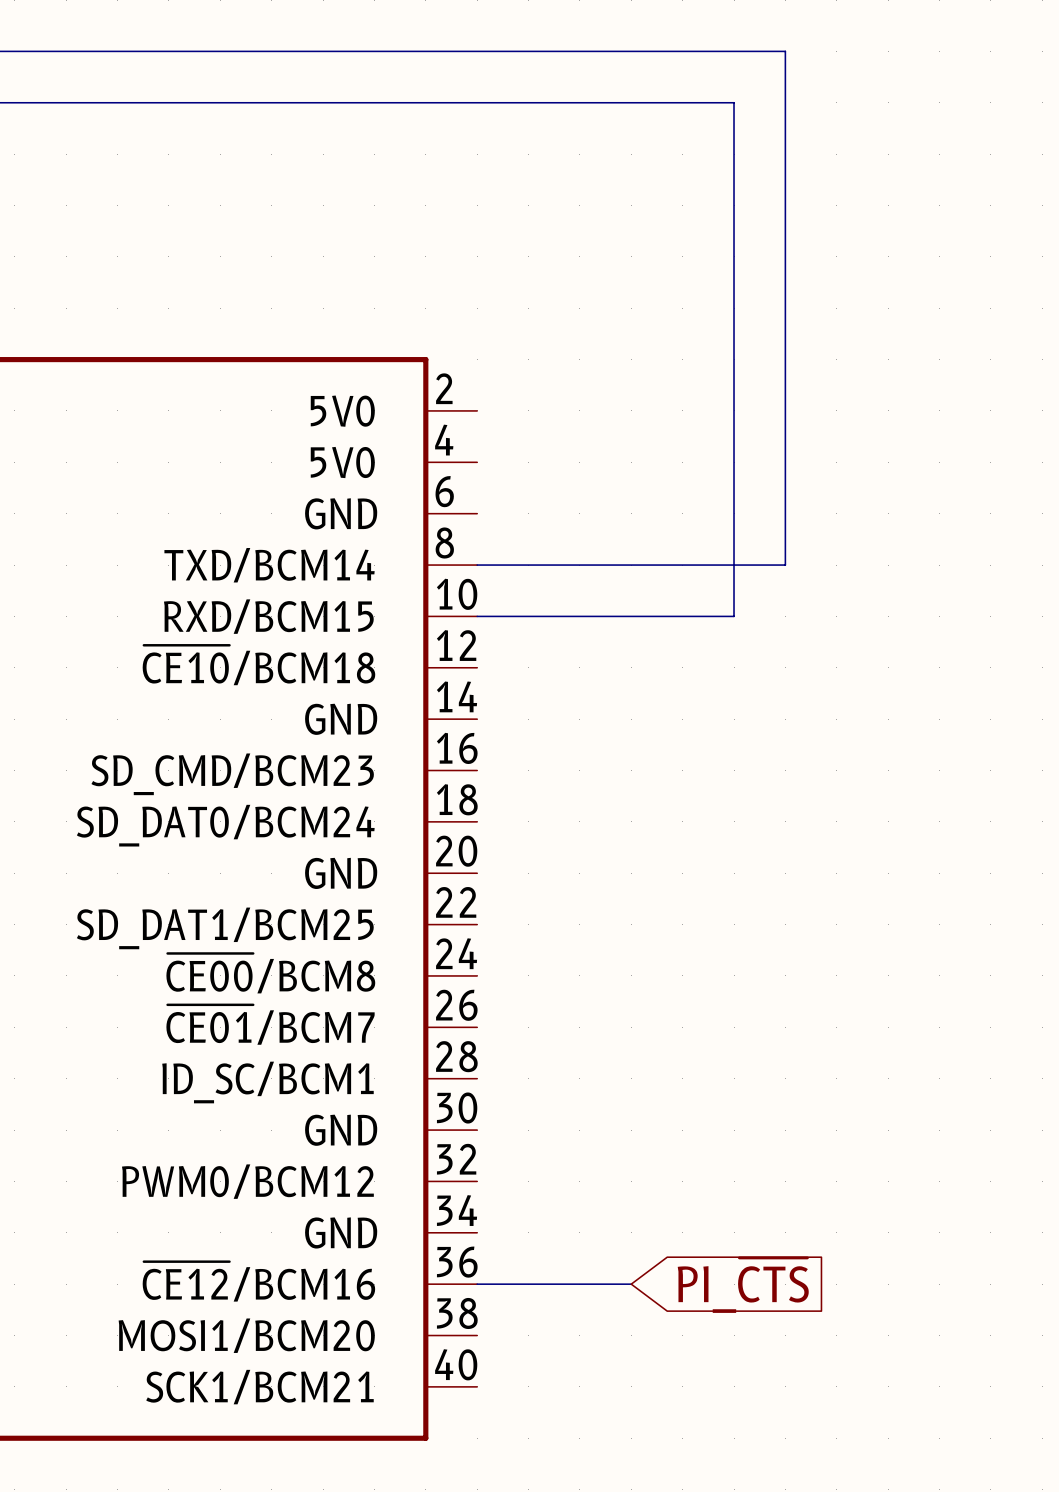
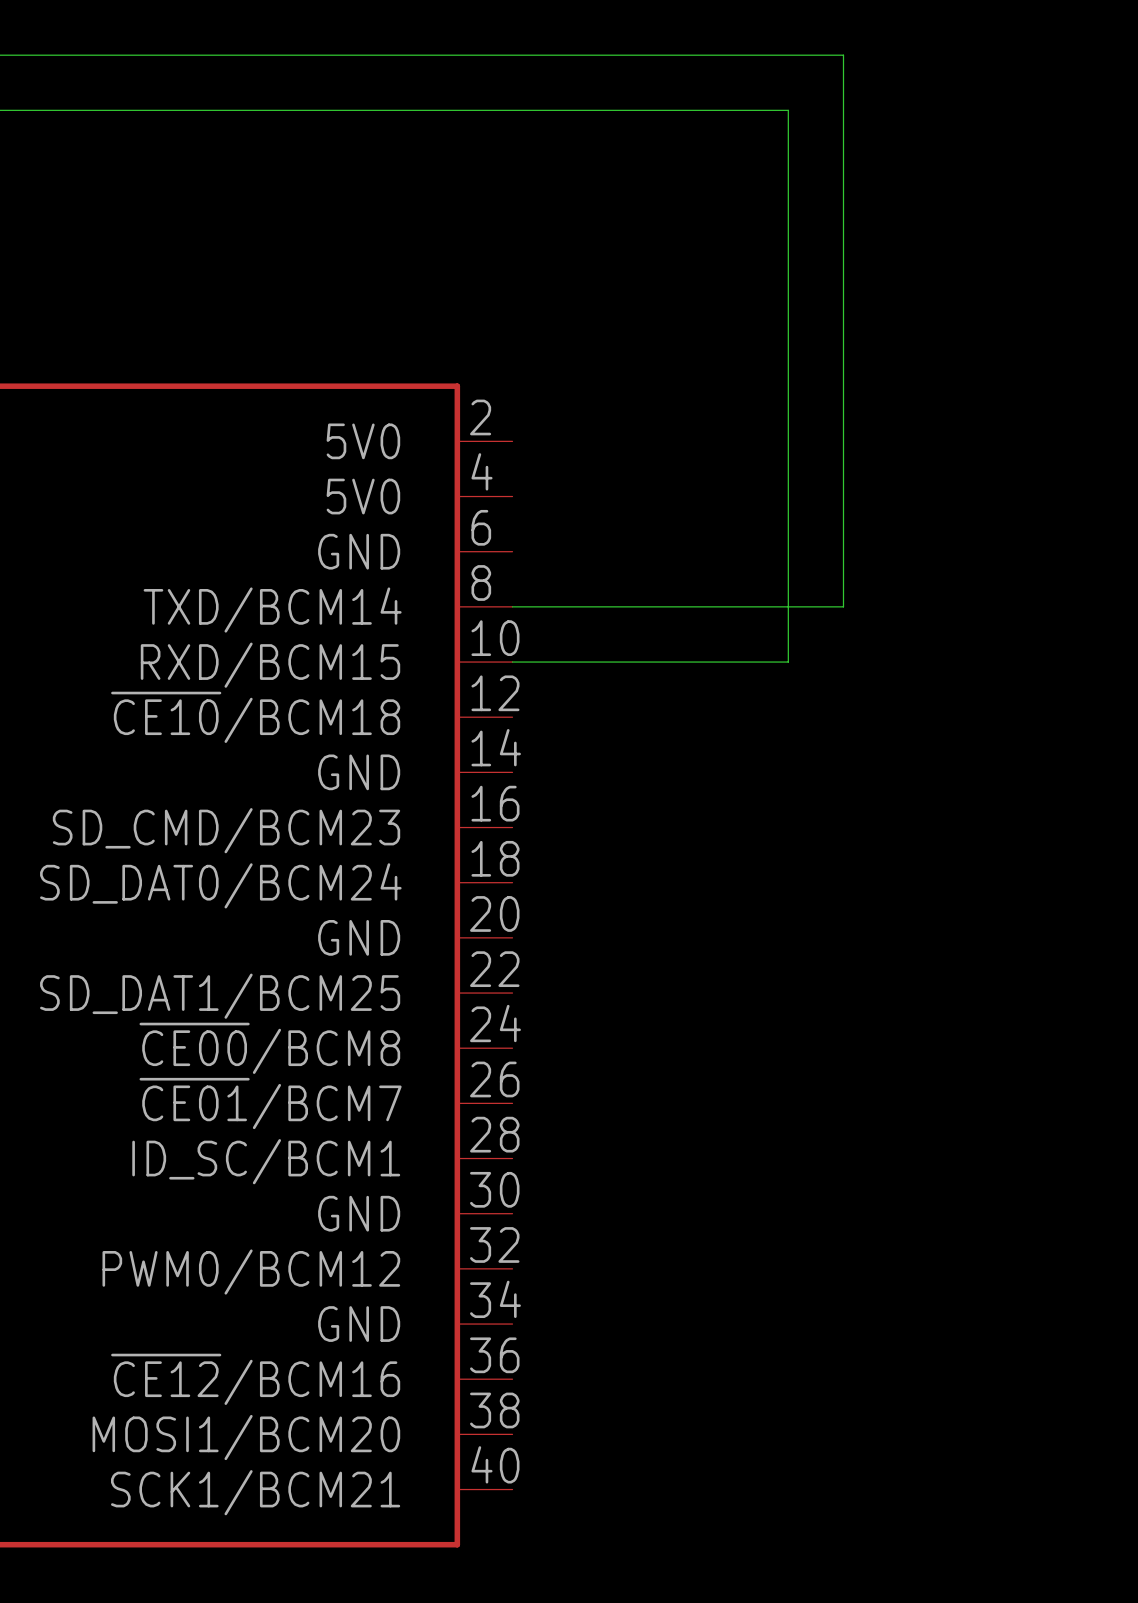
wire: (477, 1284) (631, 1284) -> none
global label: PI_~{CTS} (743, 1285) -> none

